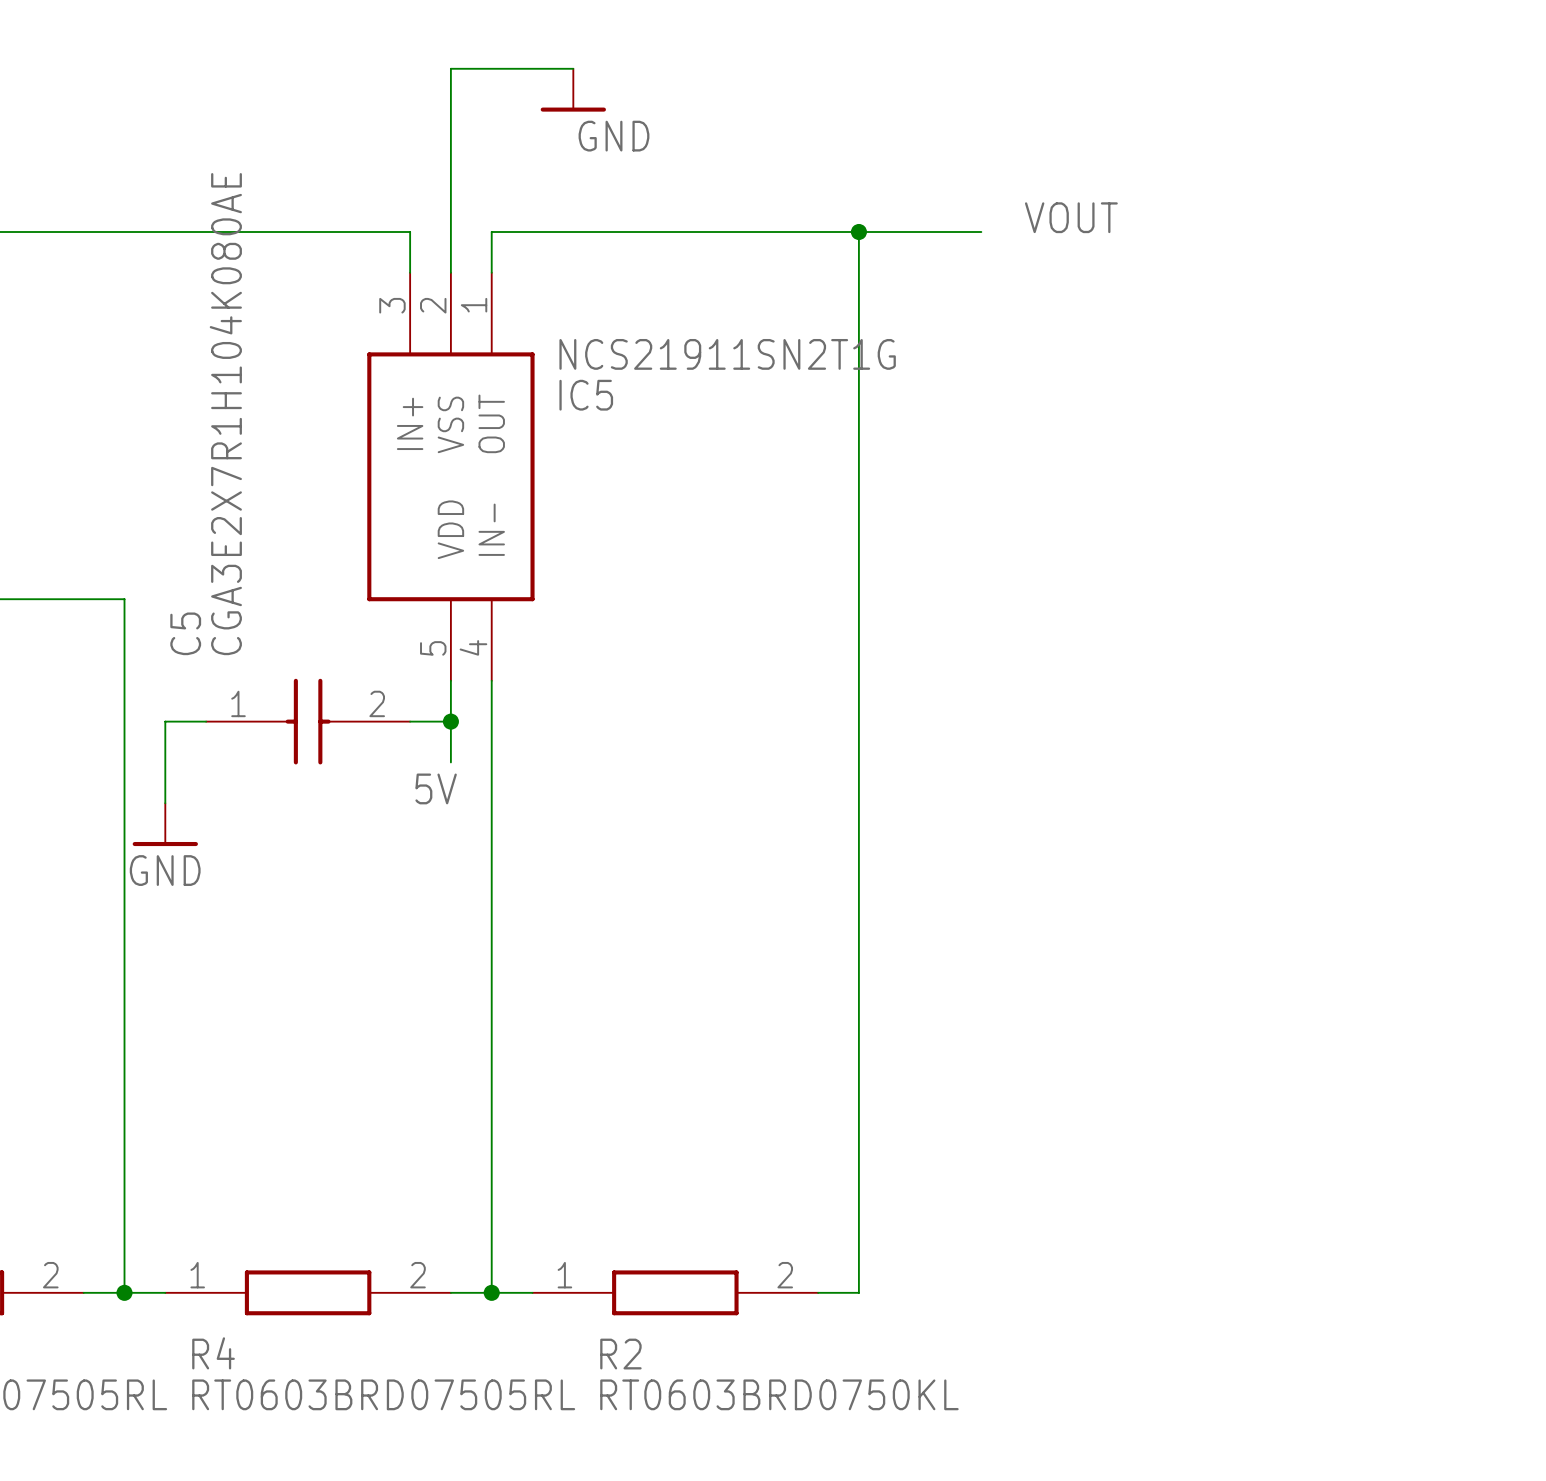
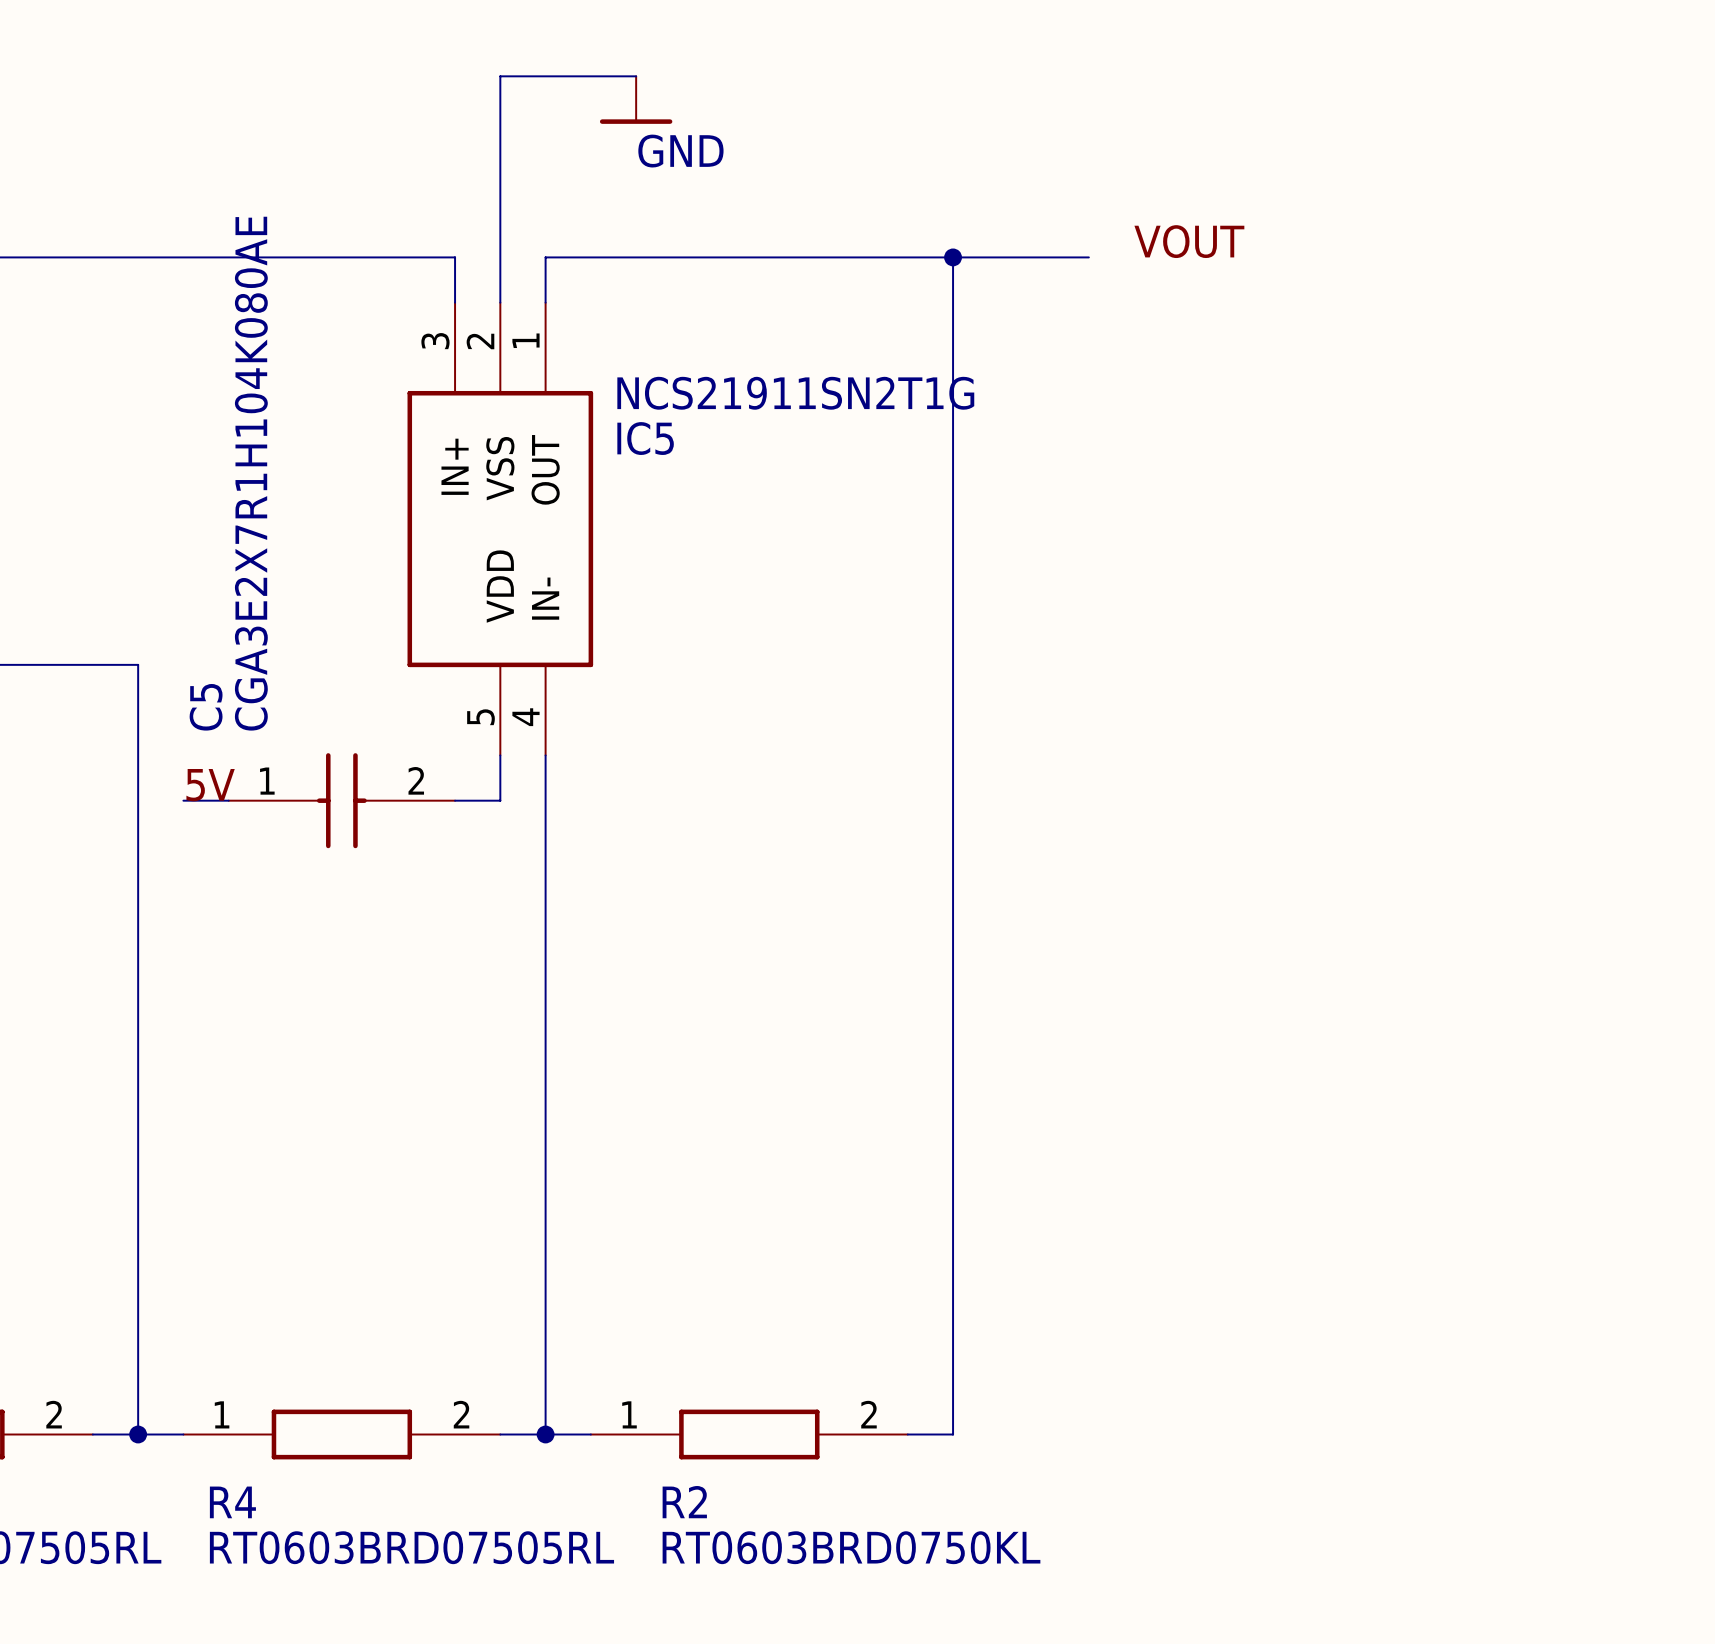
wire: (165, 721) (165, 803) -> none
wire: (450, 721) (450, 762) -> none
junction: (450, 721) -> none
label position: 5V (436, 788) -> 5V (210, 785)
power symbol: GND (165, 824) -> none

